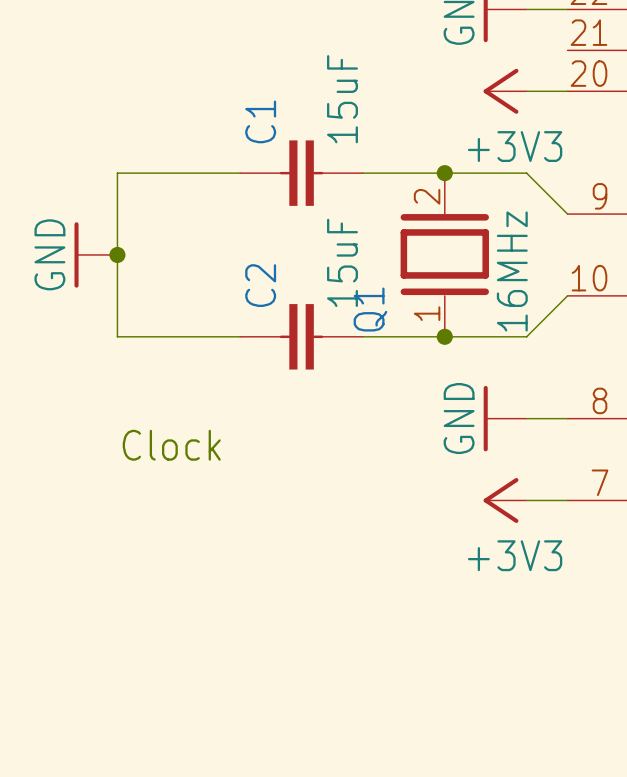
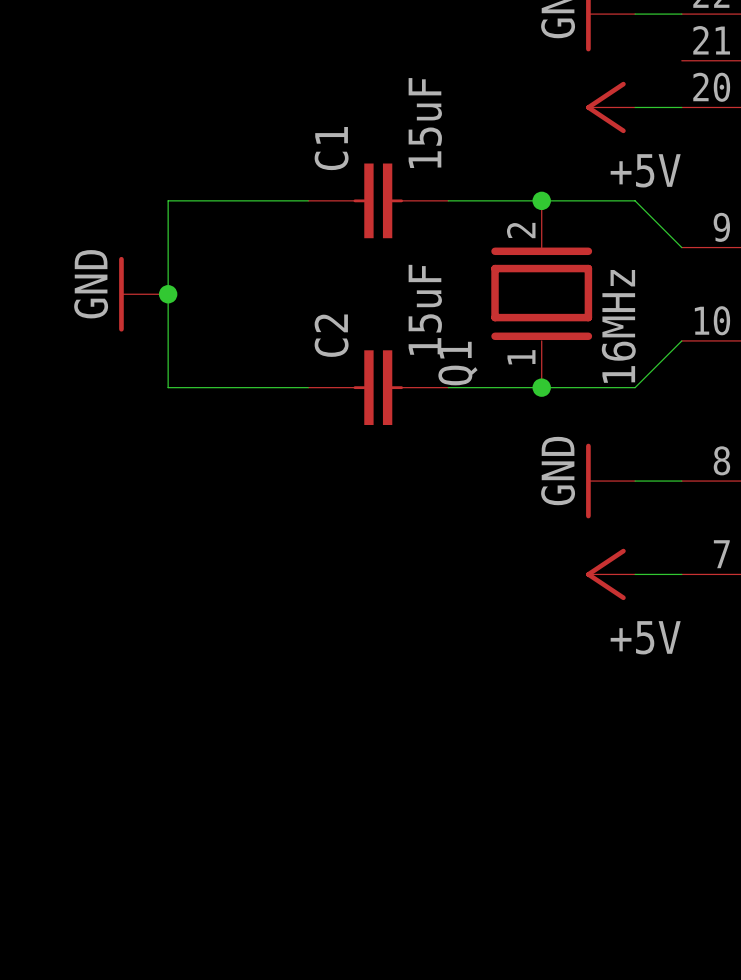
power symbol: +3V3 (505, 91) -> +5V (610, 107)
text: Clock (171, 445) -> none
power symbol: +3V3 (505, 500) -> +5V (610, 574)

